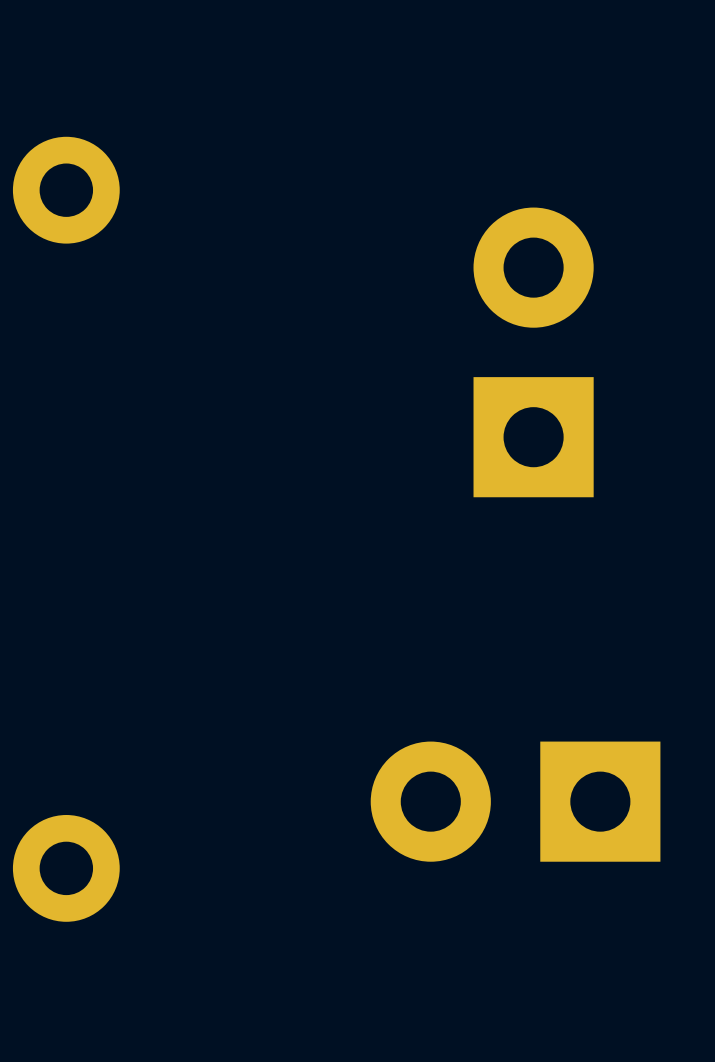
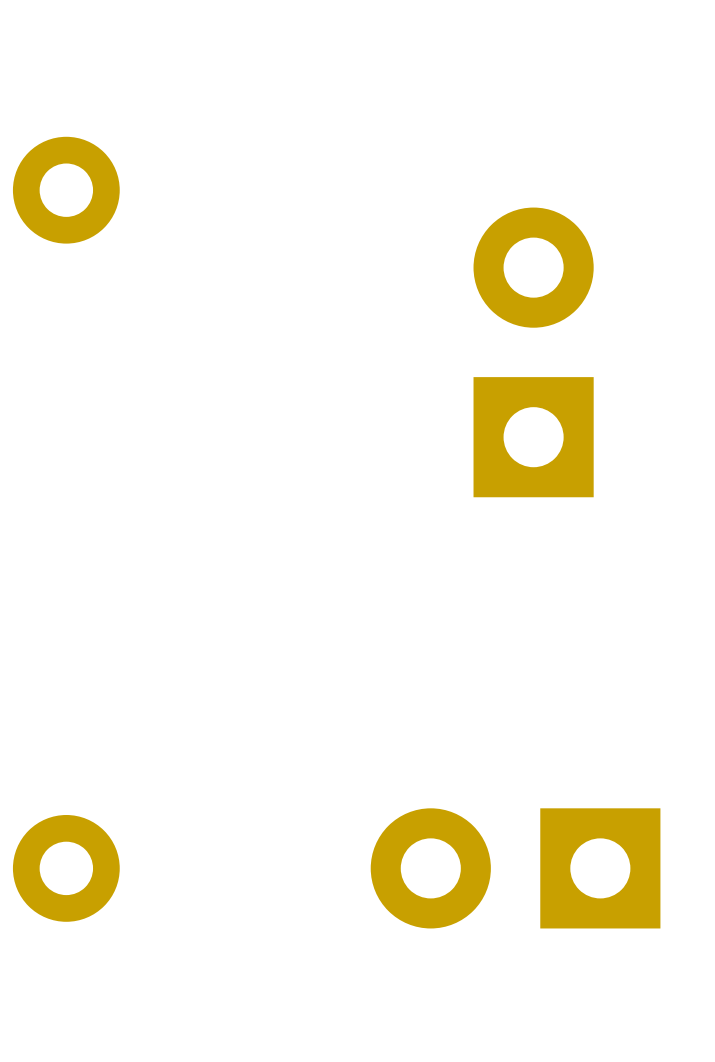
part position: (515, 801) -> (515, 868)

